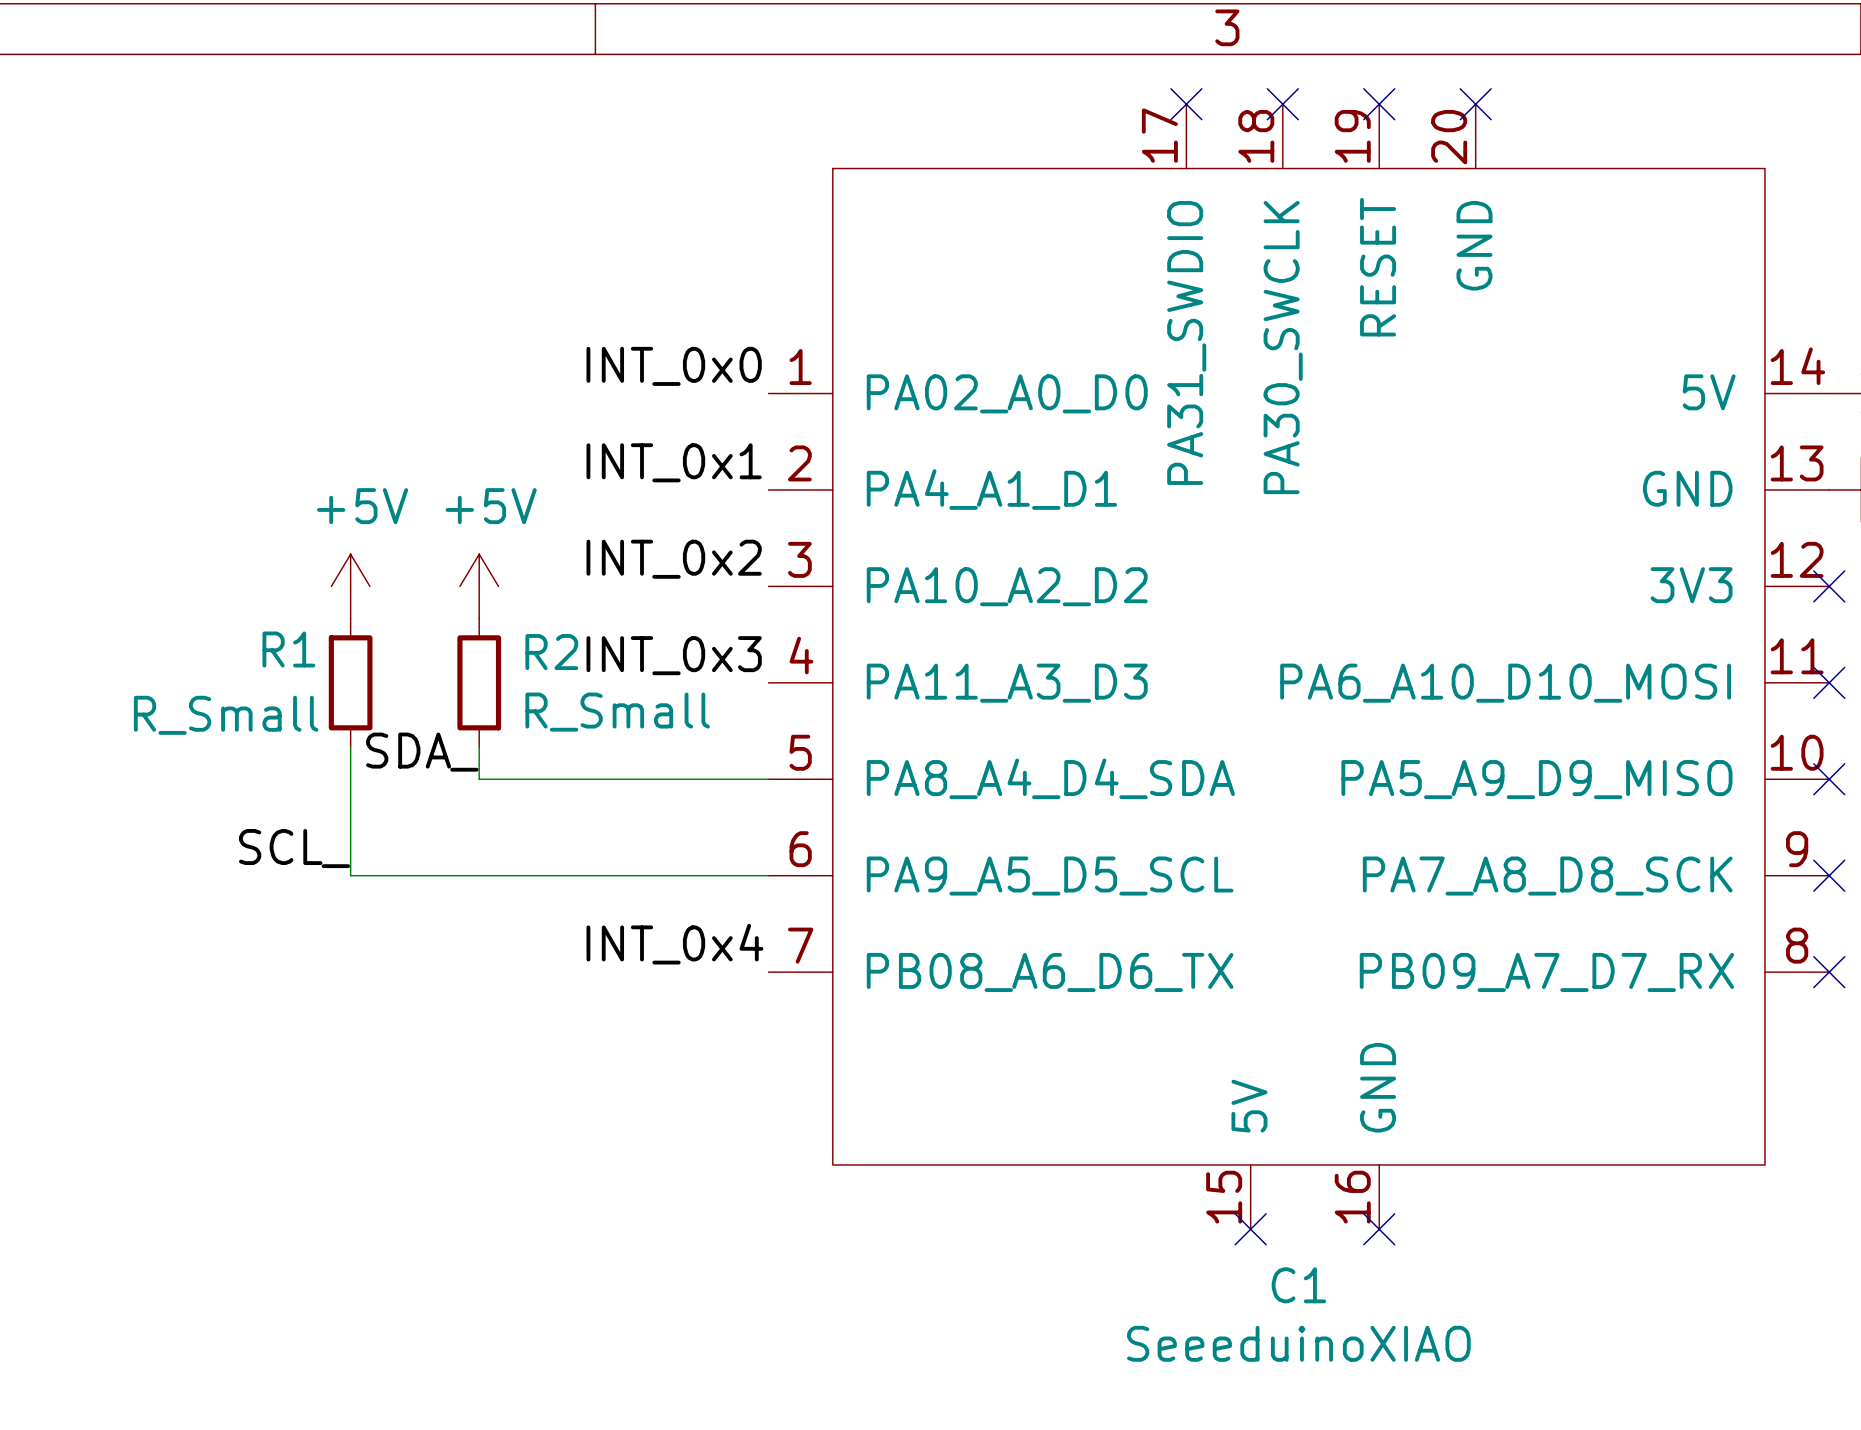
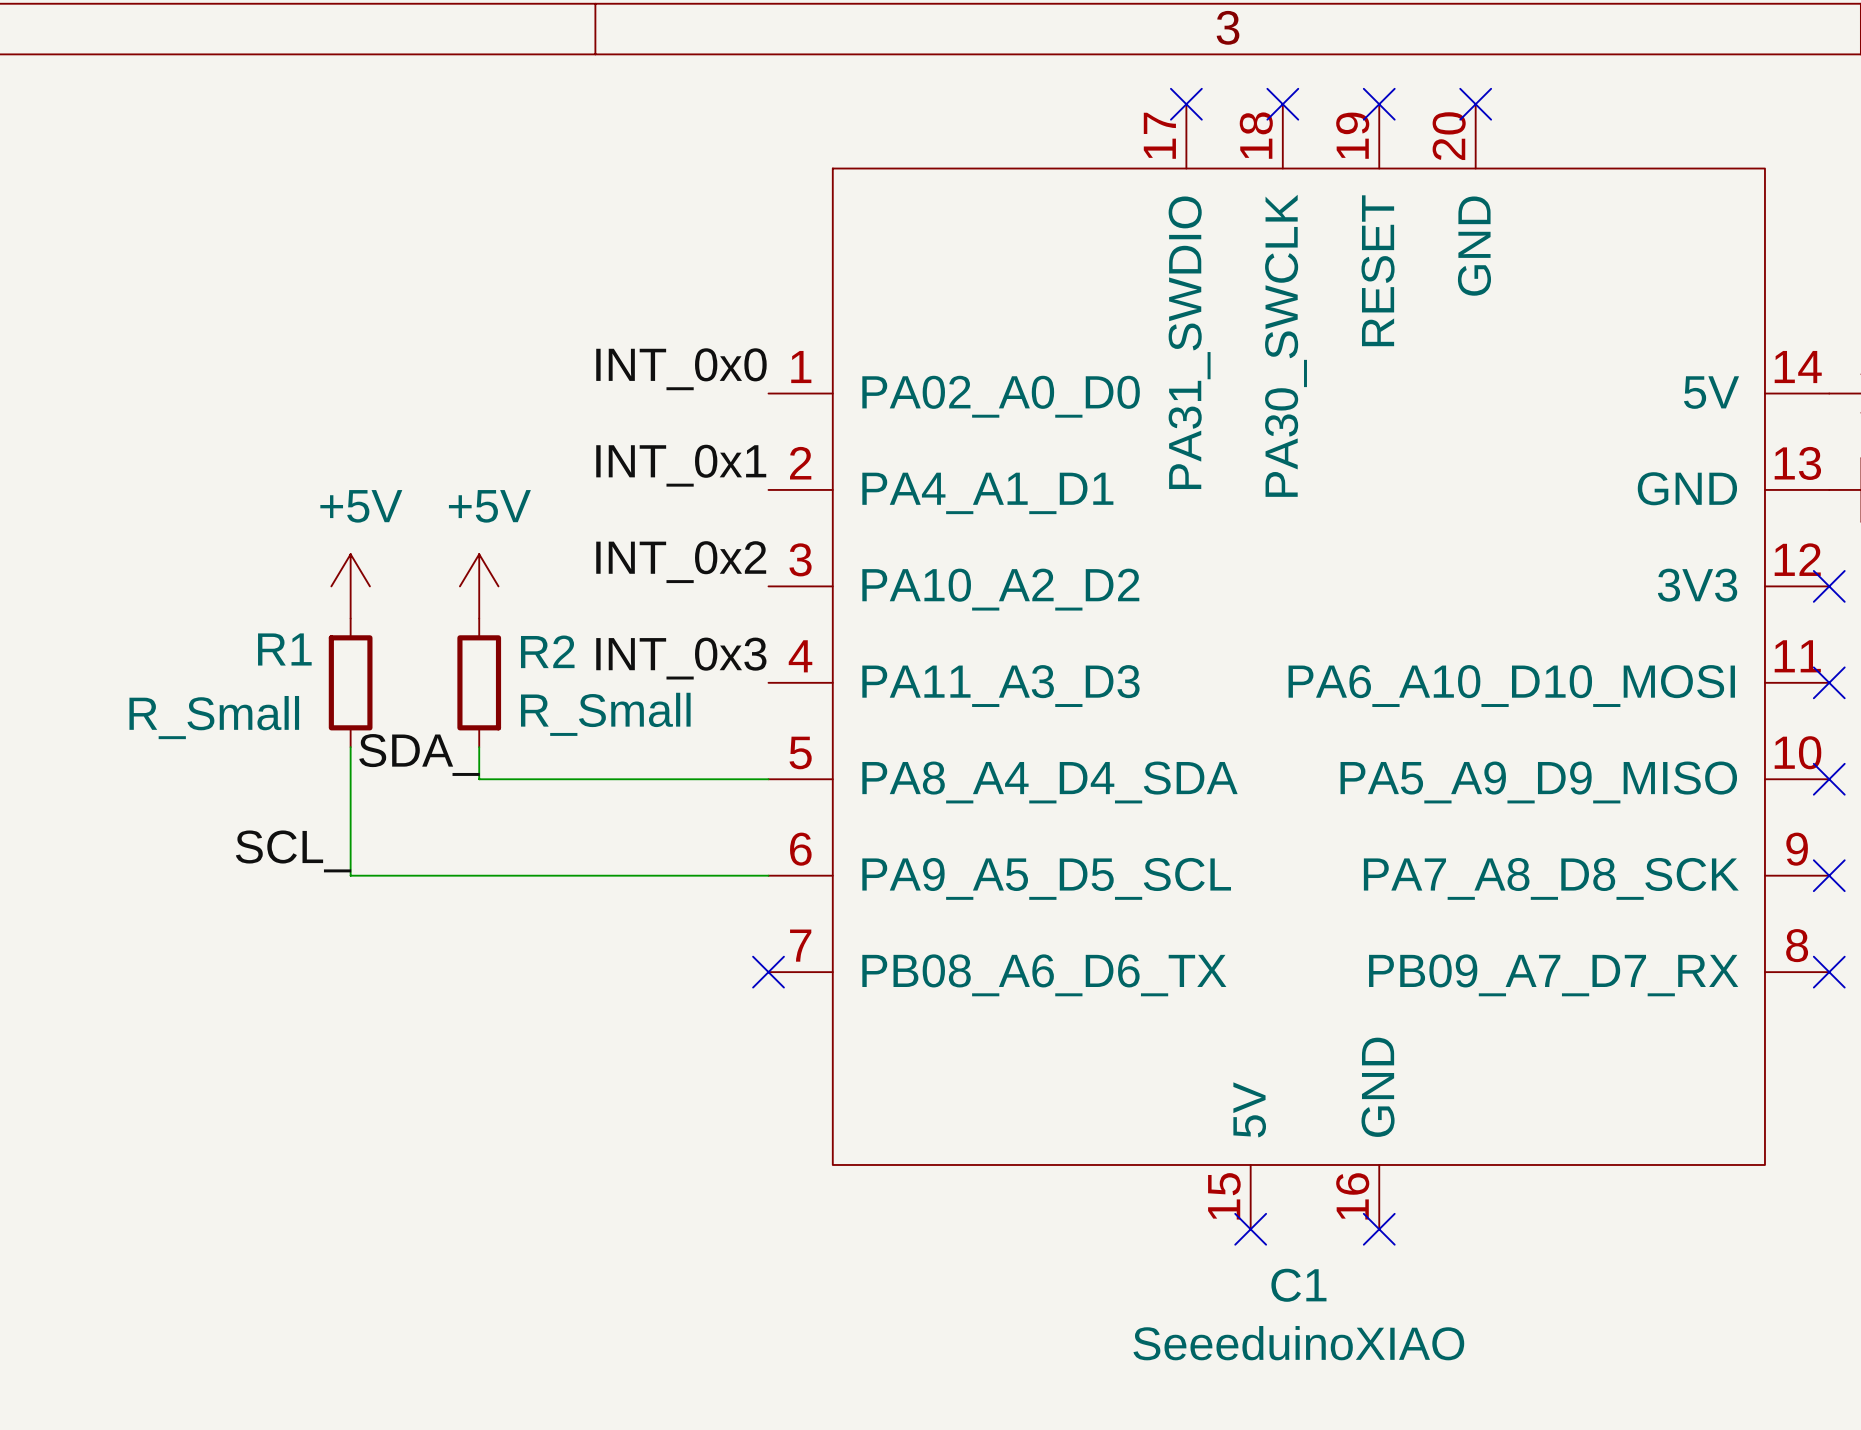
label: INT_0x4 (674, 944) -> none
no-connect mark: none -> (768, 972)

